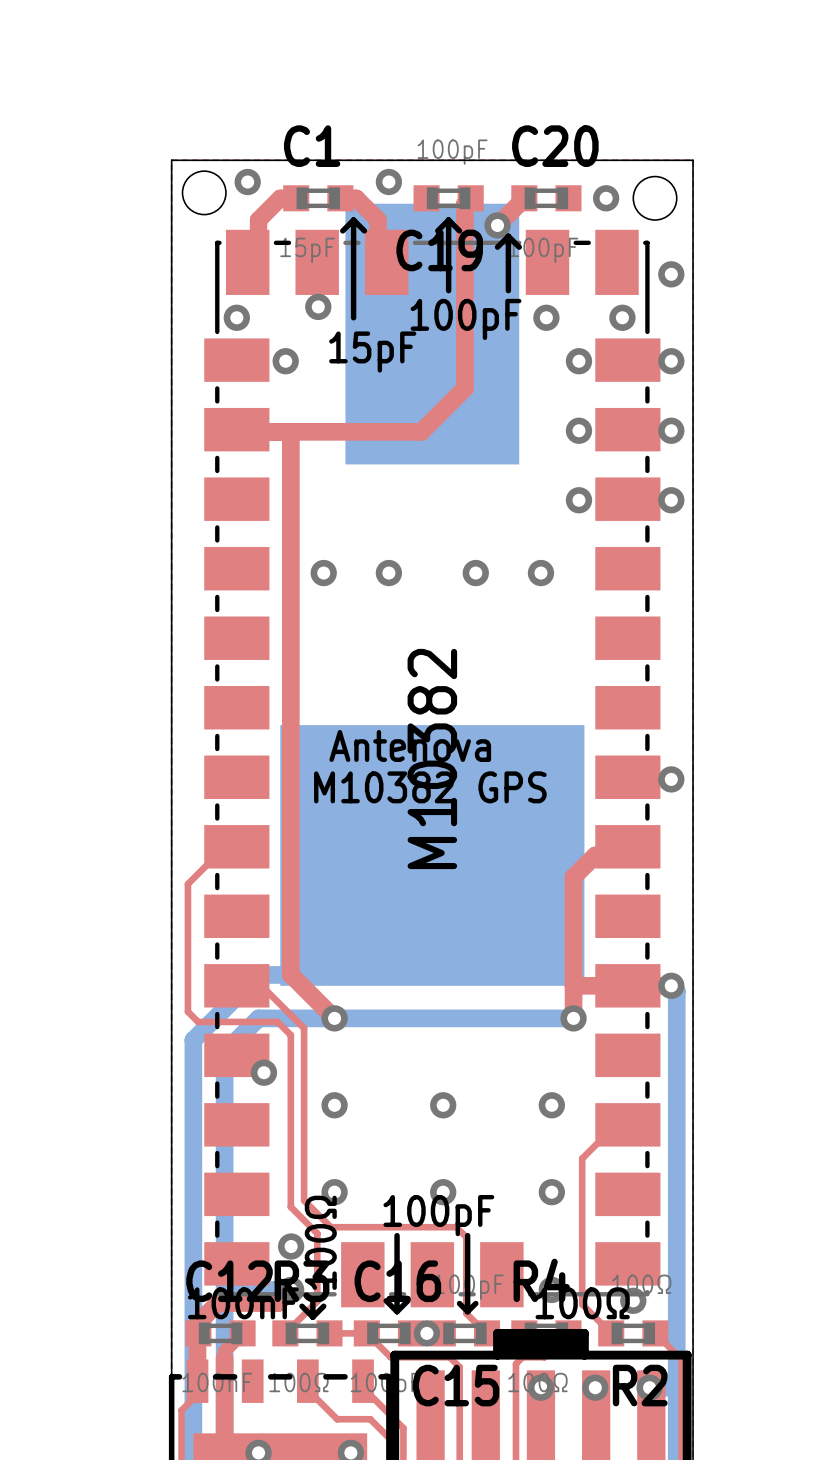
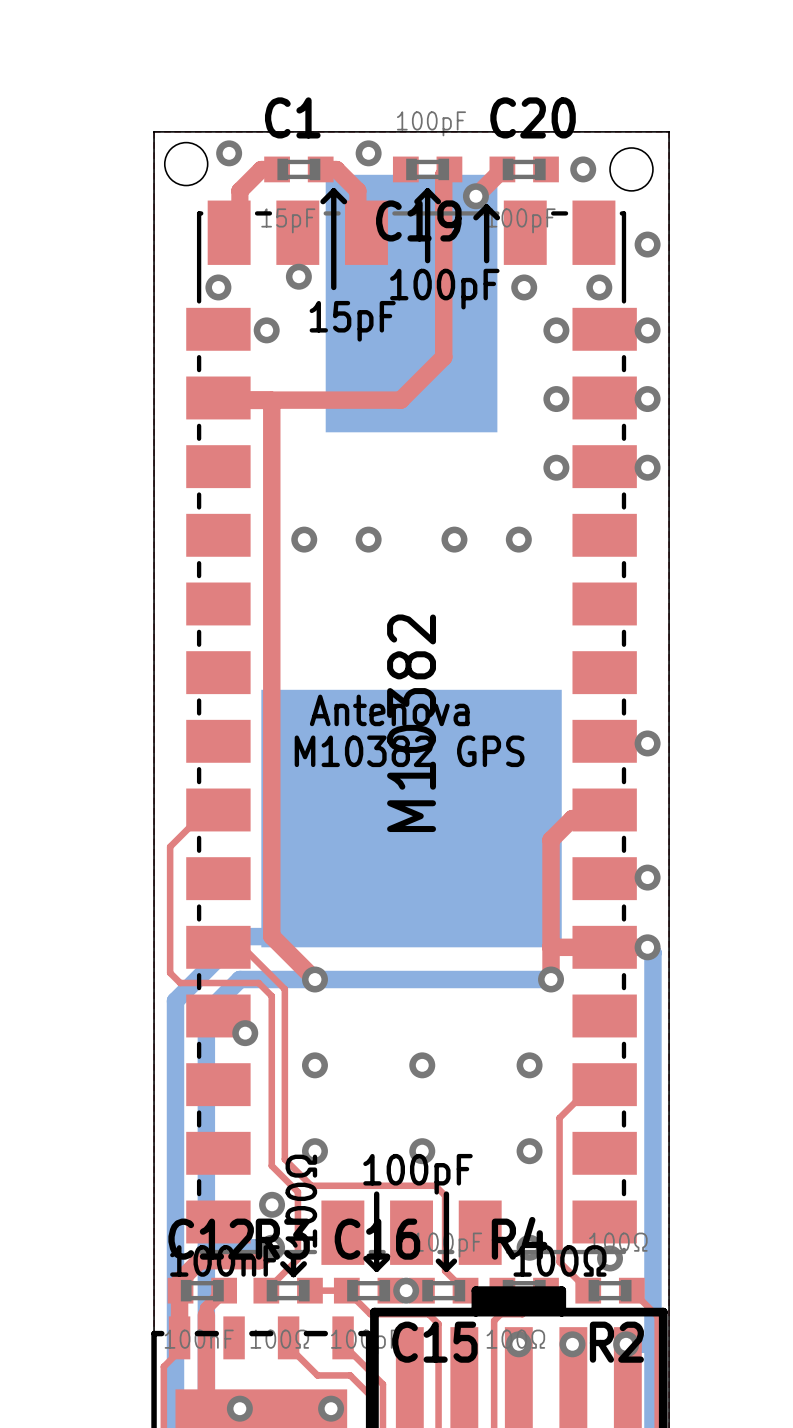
via: none -> (647, 877)

